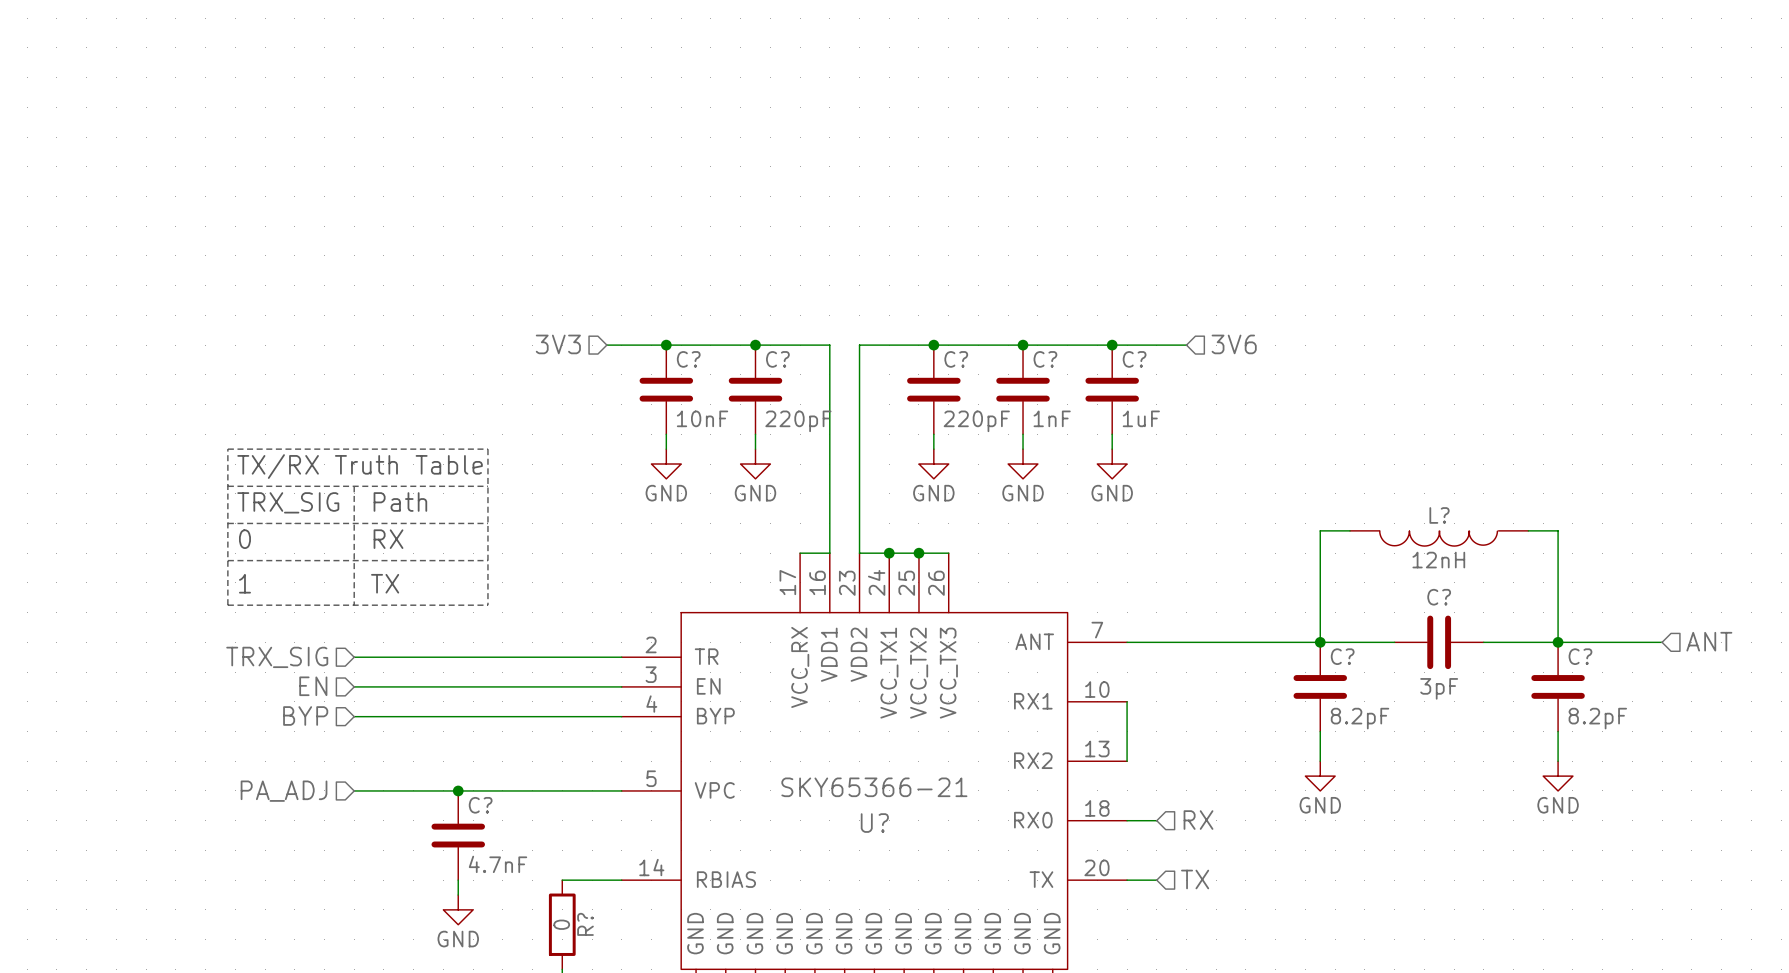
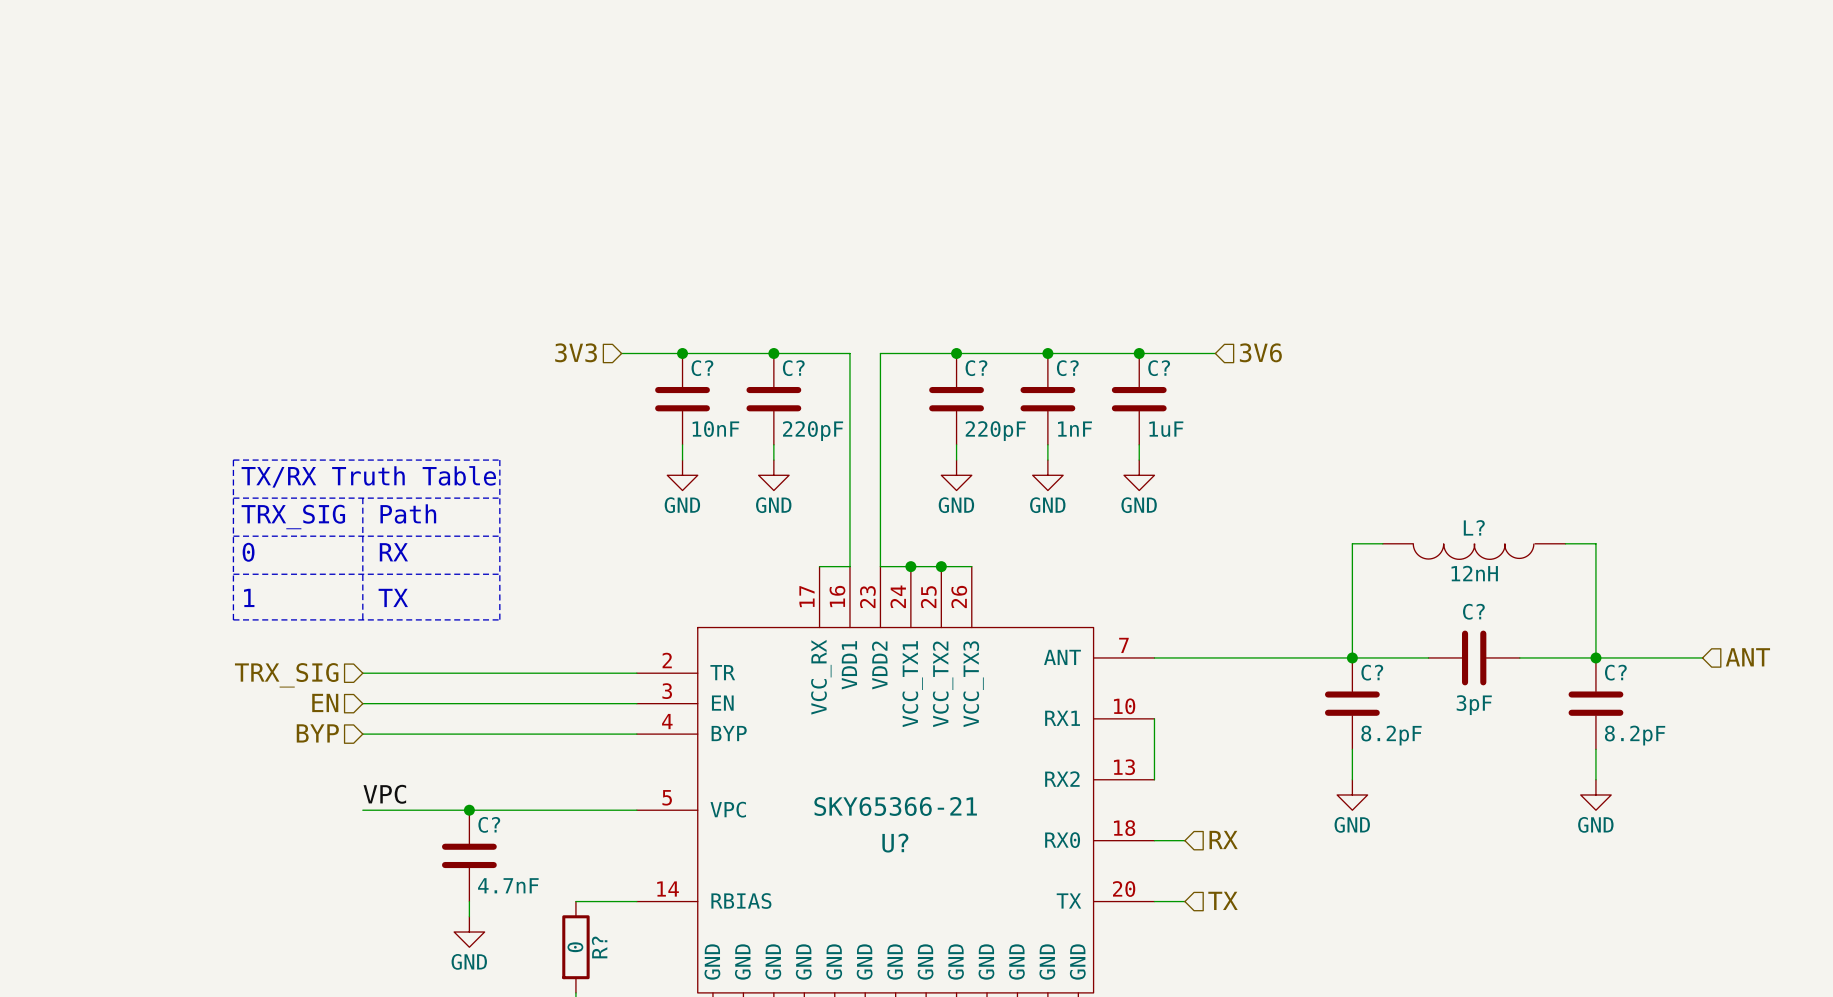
label: none -> VPC (384, 794)
hierarchical label: PA_ADJ (284, 791) -> none

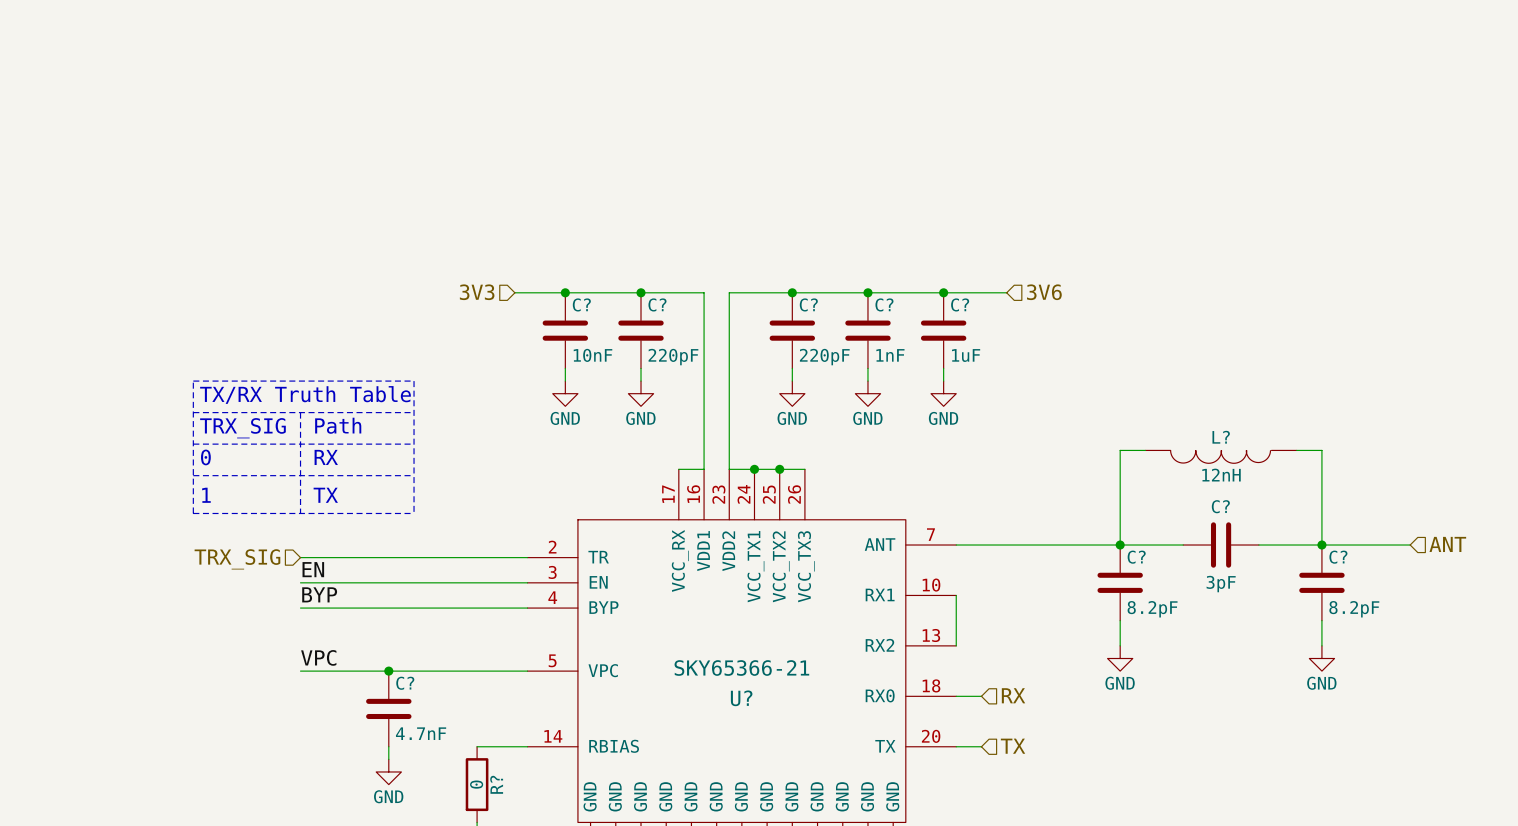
label: none -> EN (313, 569)
hierarchical label: EN (325, 702) -> none
label: none -> BYP (319, 594)
hierarchical label: BYP (317, 733) -> none

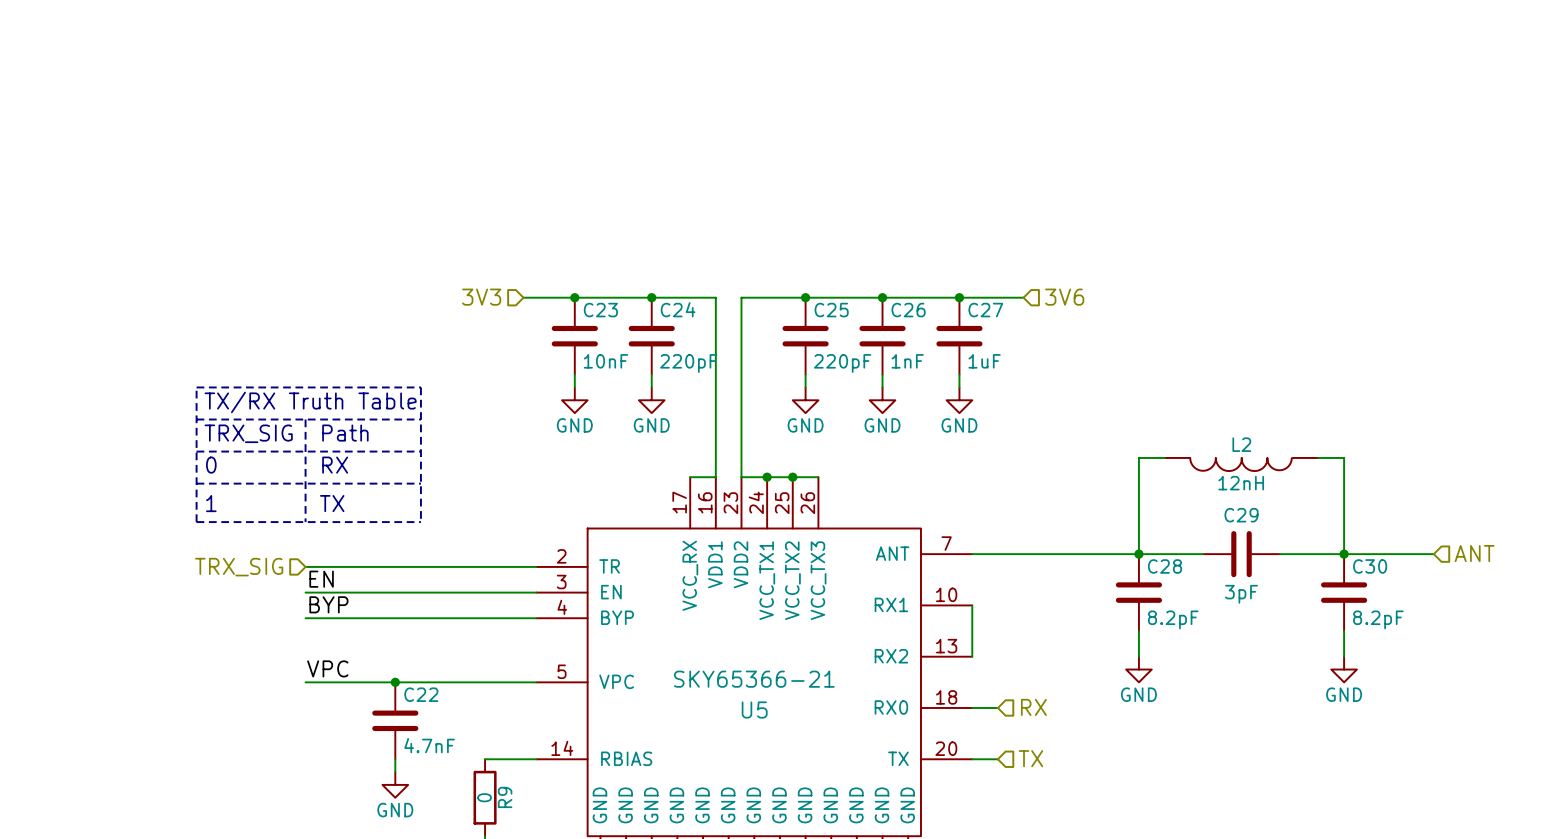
C? name: C? (581, 304) -> C23 (600, 310)
C? name: C? (657, 304) -> C24 (678, 309)
C? name: C? (808, 304) -> C25 (831, 310)
C? name: C? (884, 304) -> C26 (908, 310)
C? name: C? (960, 304) -> C27 (985, 310)
L? name: L? (1221, 437) -> L2 (1241, 444)
C? name: C? (1220, 506) -> C29 (1241, 515)
C? name: C? (1136, 557) -> C28 (1164, 566)
C? name: C? (1338, 557) -> C30 (1370, 566)
C? name: C? (405, 683) -> C22 (421, 694)
U? name: U? (741, 698) -> U5 (754, 710)
R? name: R? (496, 784) -> R9 (505, 797)

